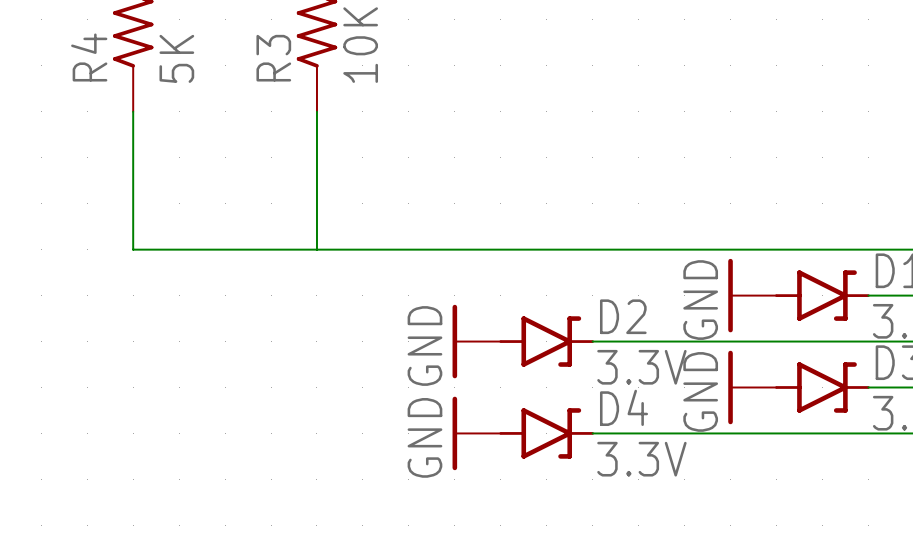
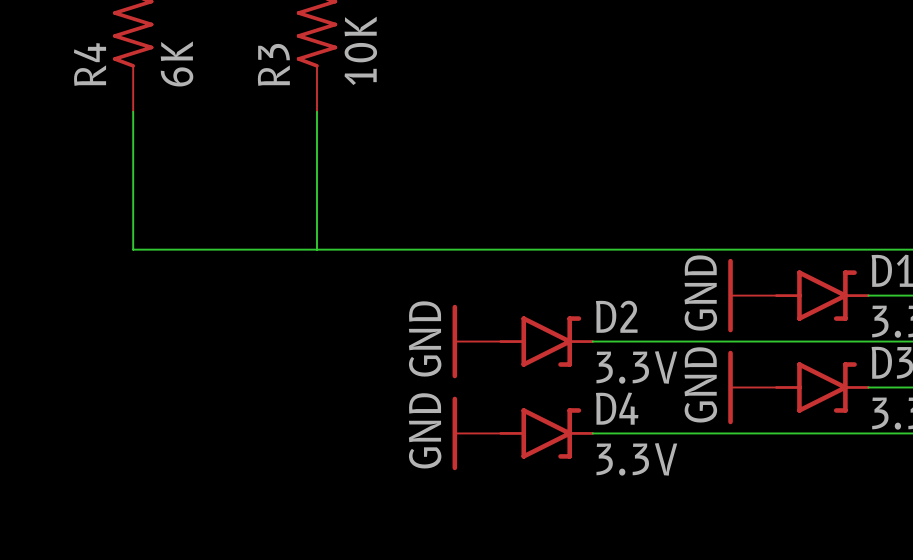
R4 value: 5K (176, 58) -> 6K (177, 63)

